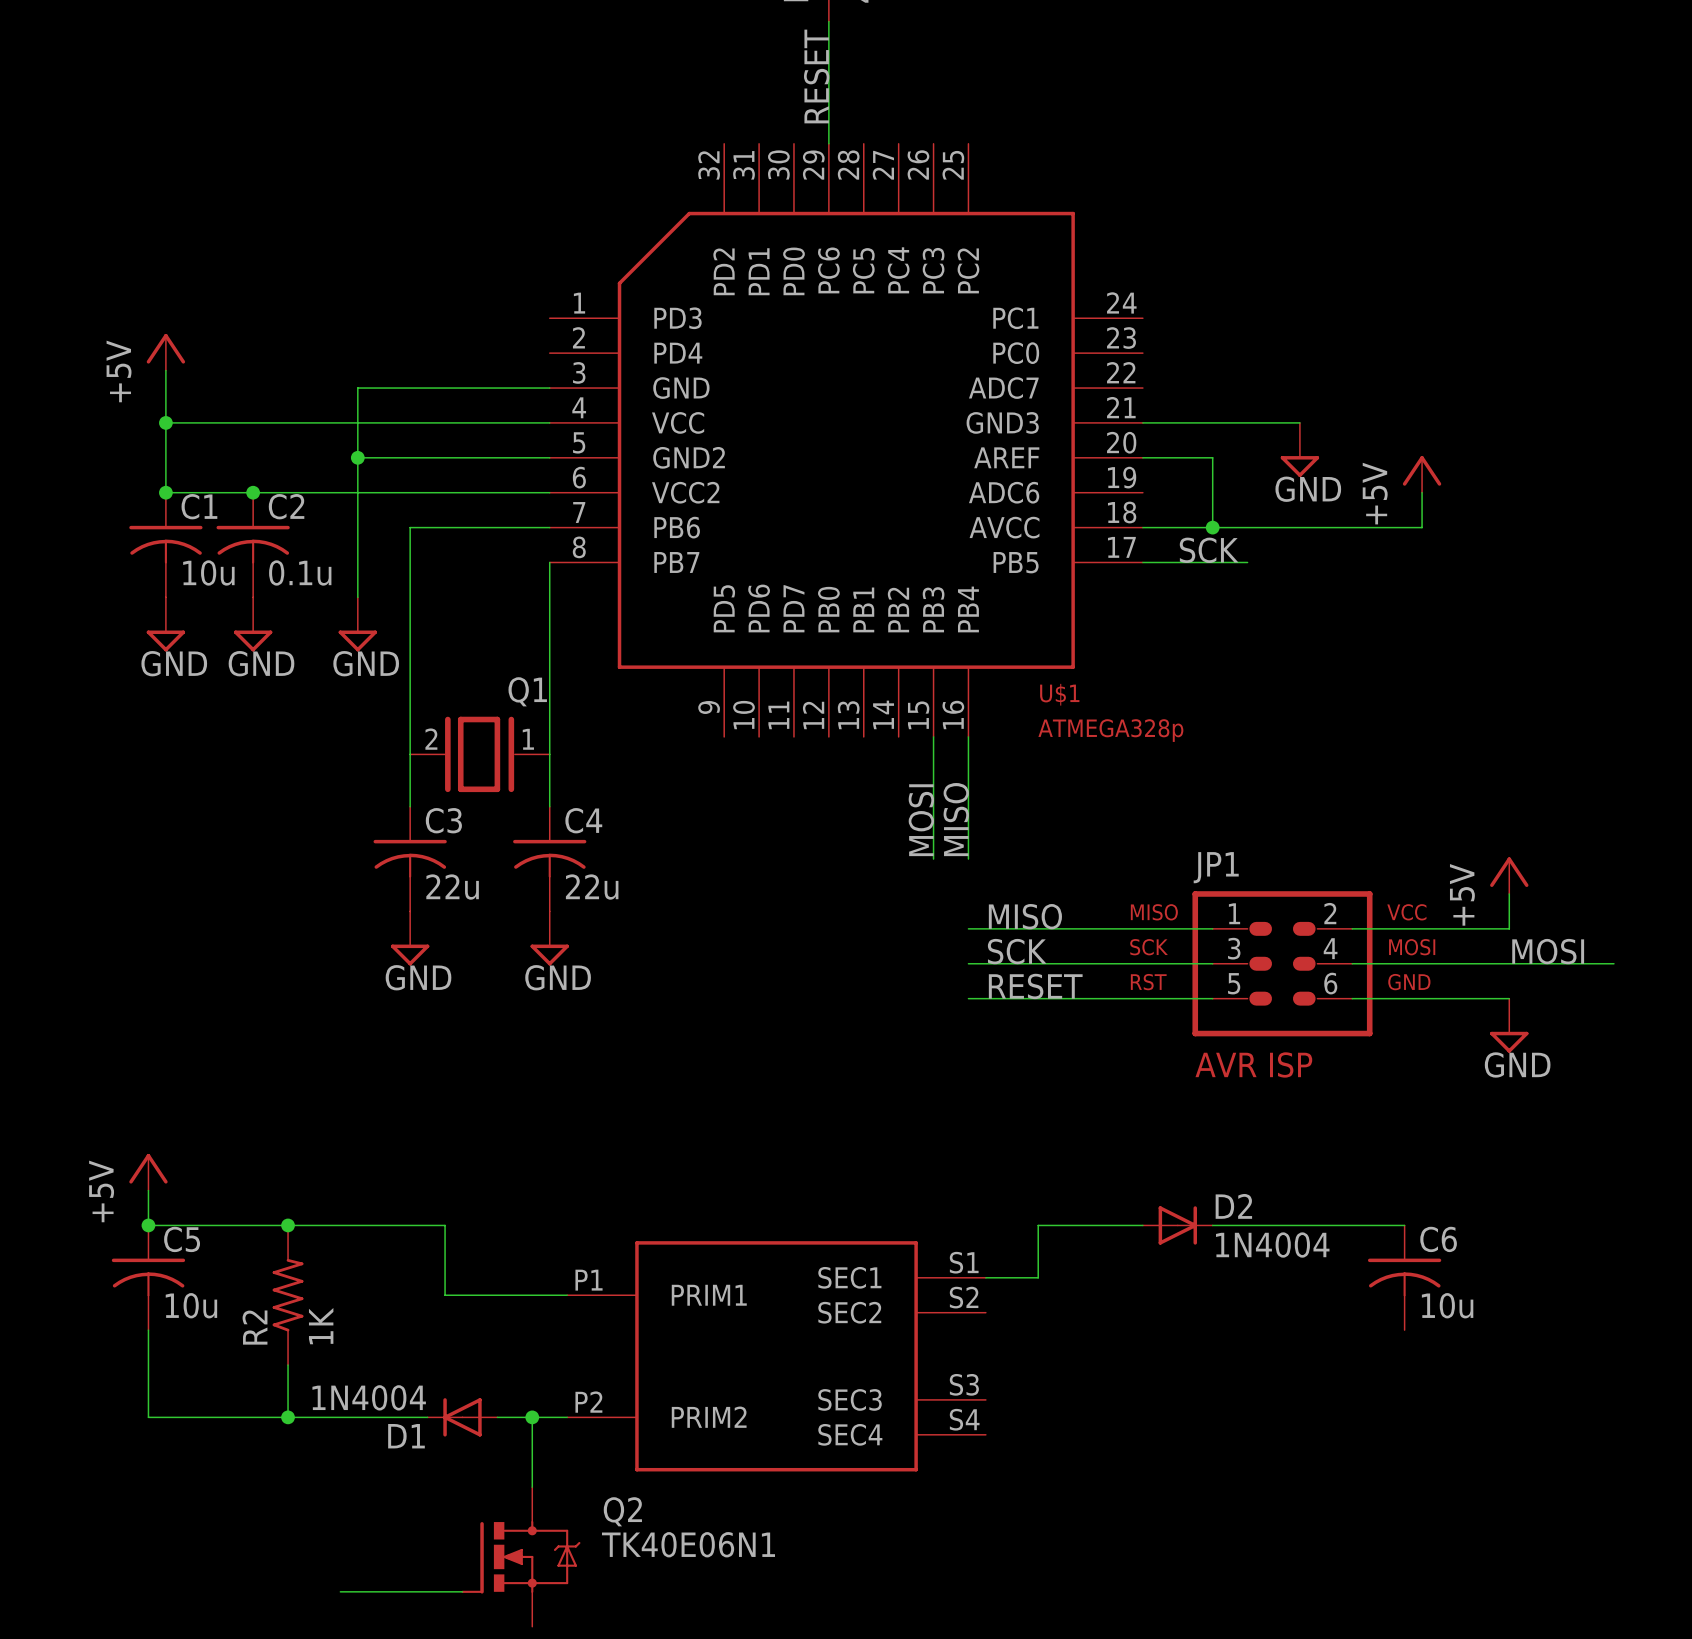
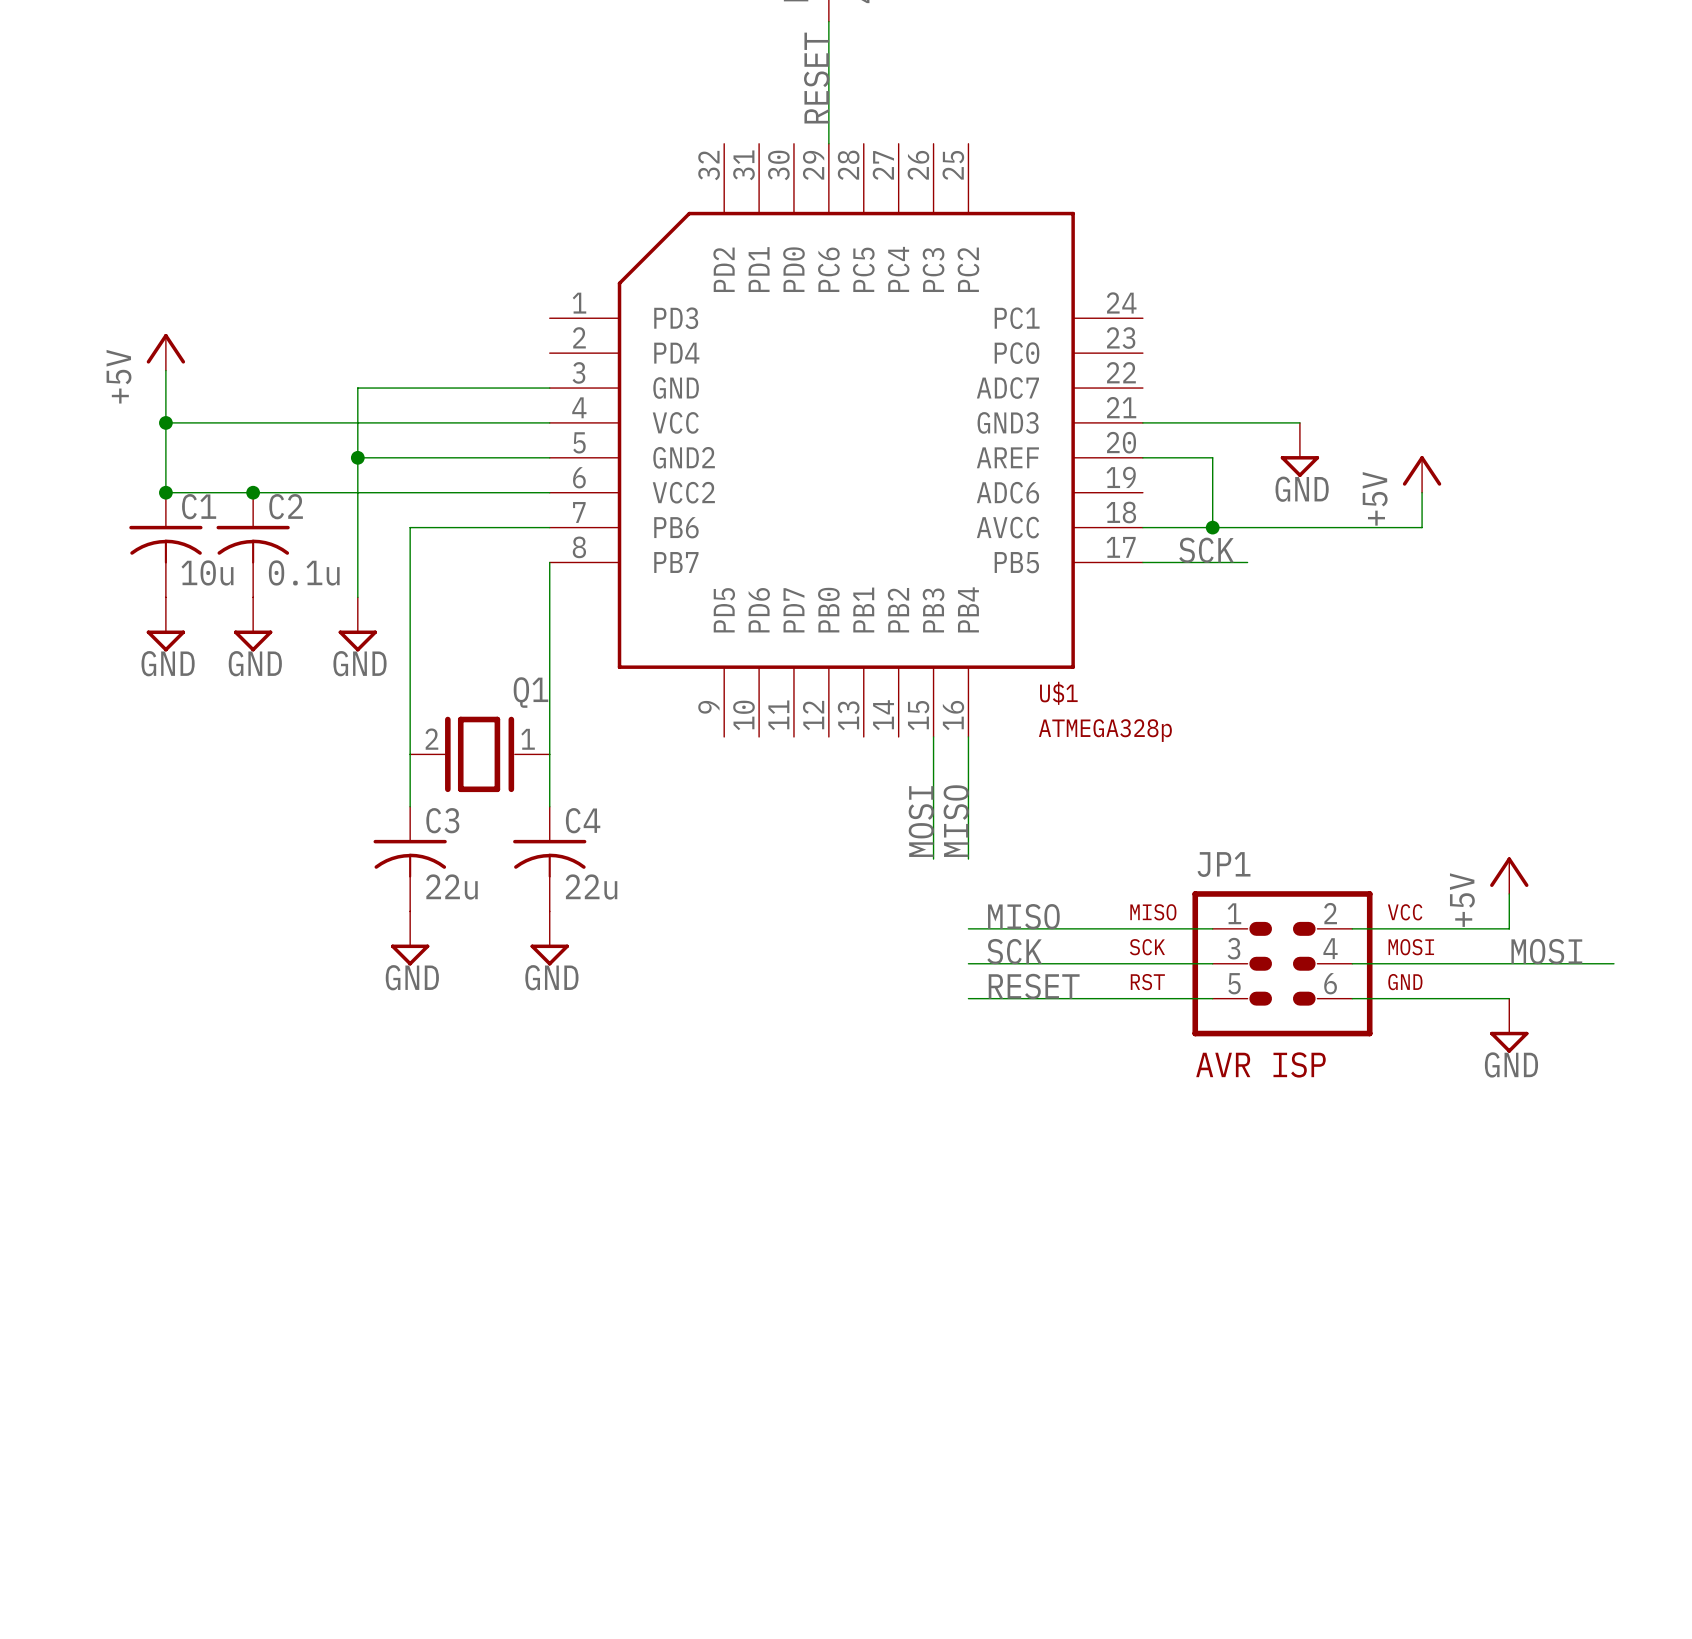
power symbol: +5V (148, 1172) -> none
wire: (148, 1190) (148, 1225) (445, 1225) (445, 1295) (567, 1295) -> none
junction: (148, 1225) -> none
junction: (288, 1225) -> none
wire: (1142, 1225) (1038, 1225) (1038, 1277) (985, 1277) -> none
D2: 1N4004 (1177, 1225) -> none
wire: (1212, 1225) (1404, 1225) -> none
C5: 10u (148, 1277) -> none
C6: 10u (1404, 1277) -> none
R2: 1K (288, 1295) -> none
wire: (148, 1330) (148, 1417) (427, 1417) -> none
part: (776, 1356) -> none
wire: (288, 1365) (288, 1417) -> none
junction: (288, 1417) -> none
D1: 1N4004 (462, 1417) -> none
wire: (497, 1417) (567, 1417) -> none
wire: (532, 1417) (532, 1487) -> none
junction: (532, 1417) -> none
Q2: TK40E06N1 (520, 1556) -> none
wire: (340, 1591) (462, 1591) -> none

